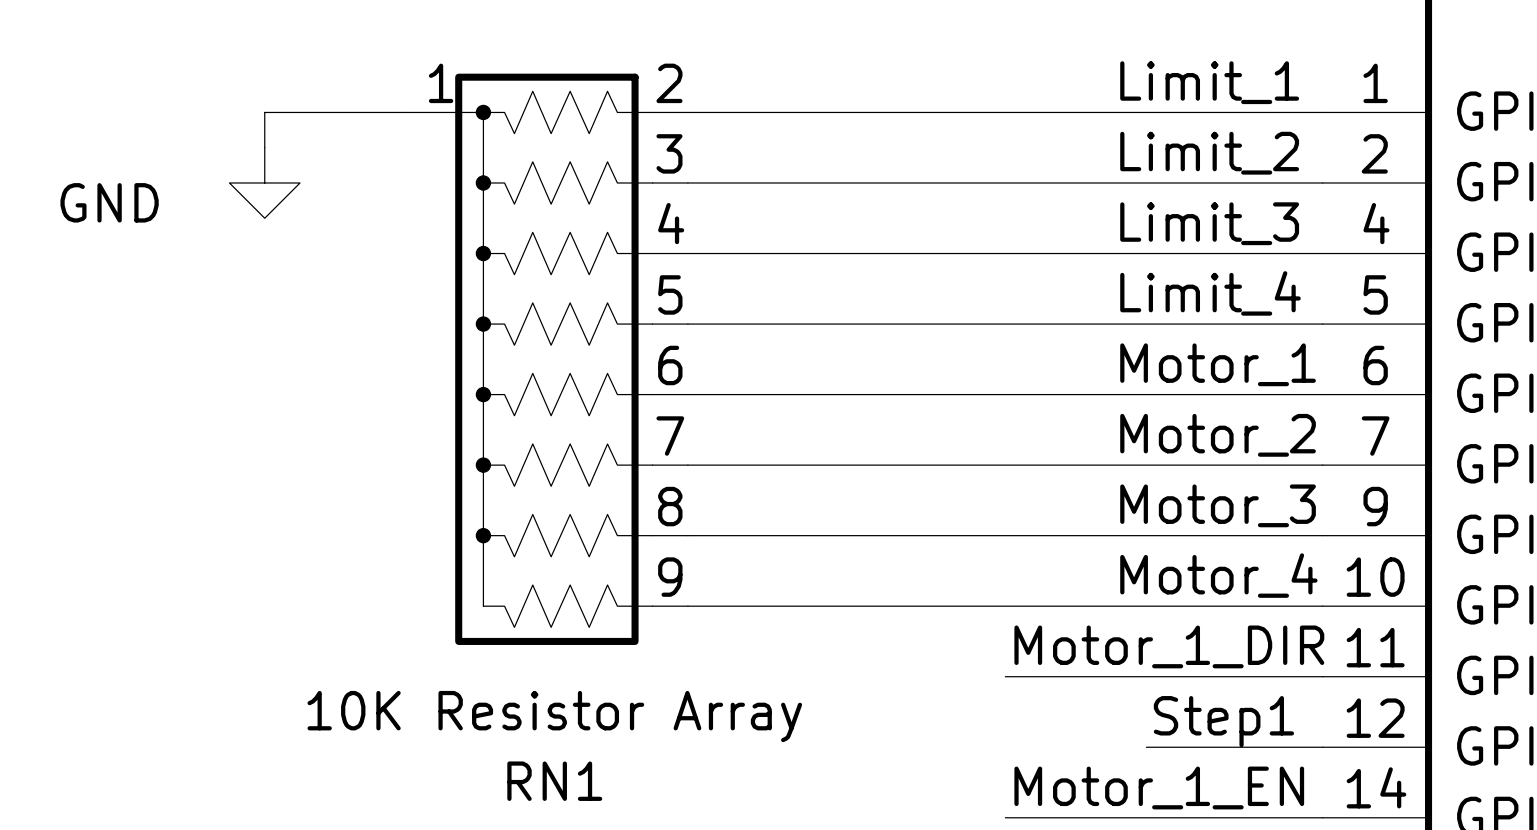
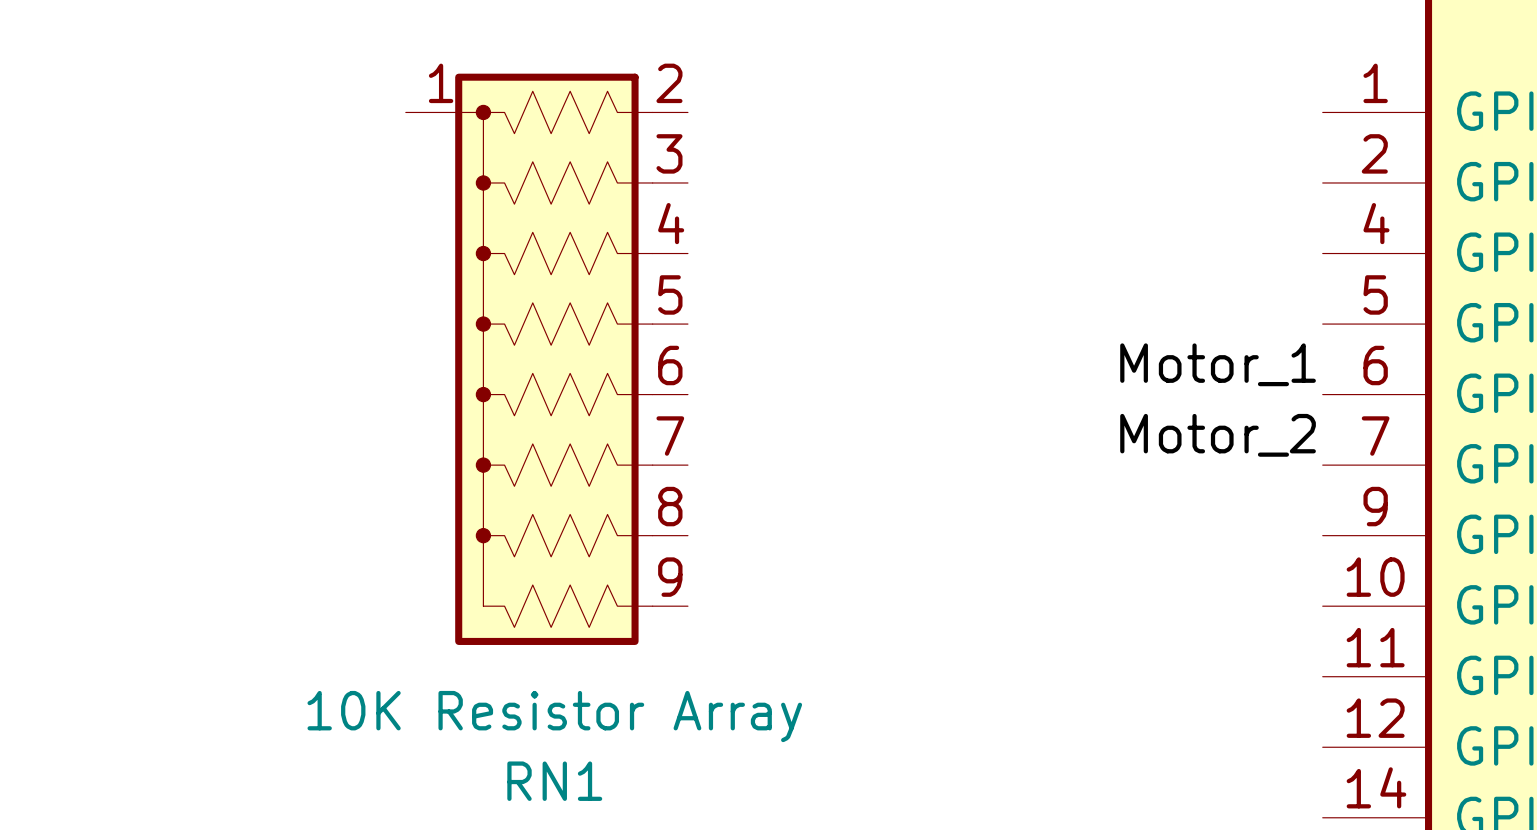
label: Limit_1 (1209, 82) -> none
wire: (405, 112) (264, 112) (264, 147) -> none
wire: (687, 112) (1322, 112) -> none
label: Limit_2 (1209, 153) -> none
power symbol: GND (264, 182) -> none
wire: (687, 182) (1322, 182) -> none
label: Limit_3 (1209, 223) -> none
wire: (687, 253) (1322, 253) -> none
label: Limit_4 (1210, 293) -> none
wire: (687, 324) (1322, 324) -> none
wire: (687, 394) (1322, 394) -> none
wire: (687, 465) (1322, 465) -> none
label: Motor_3 (1218, 505) -> none
wire: (687, 535) (1322, 535) -> none
label: Motor_4 (1218, 575) -> none
wire: (687, 606) (1322, 606) -> none
label: Motor_1_DIR (1169, 646) -> none
wire: (1005, 676) (1322, 676) -> none
label: Step1 (1223, 721) -> none
wire: (1146, 747) (1322, 747) -> none
label: Motor_1_EN (1159, 787) -> none
wire: (1005, 817) (1322, 817) -> none

